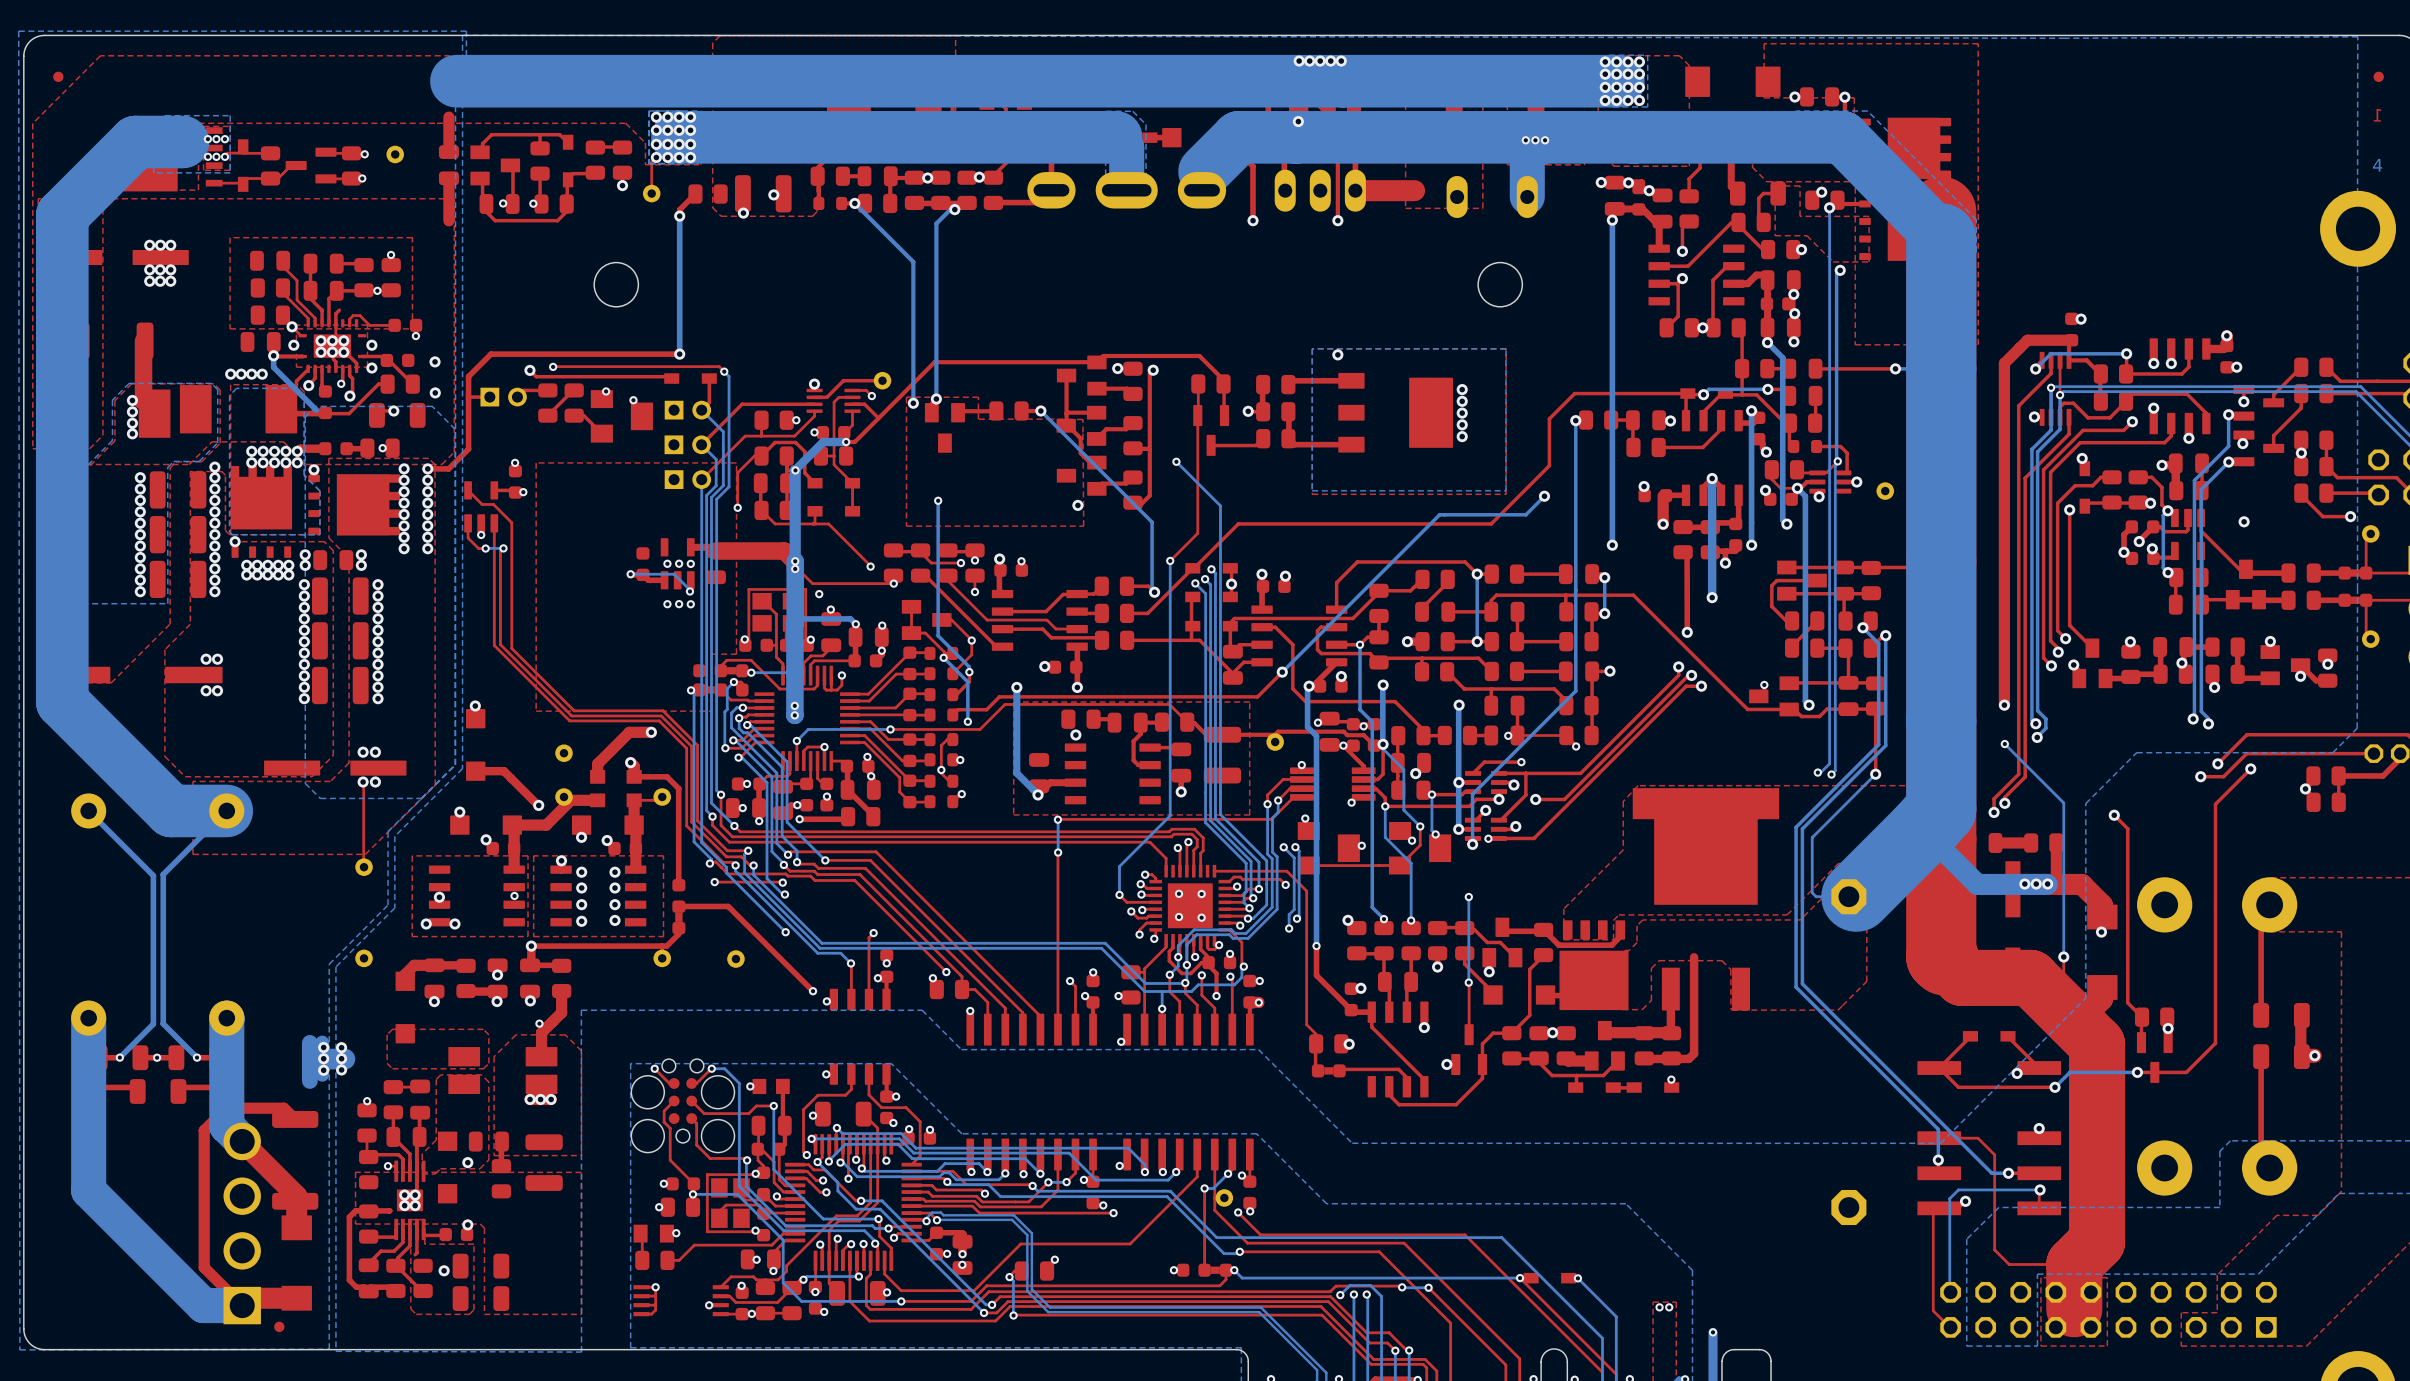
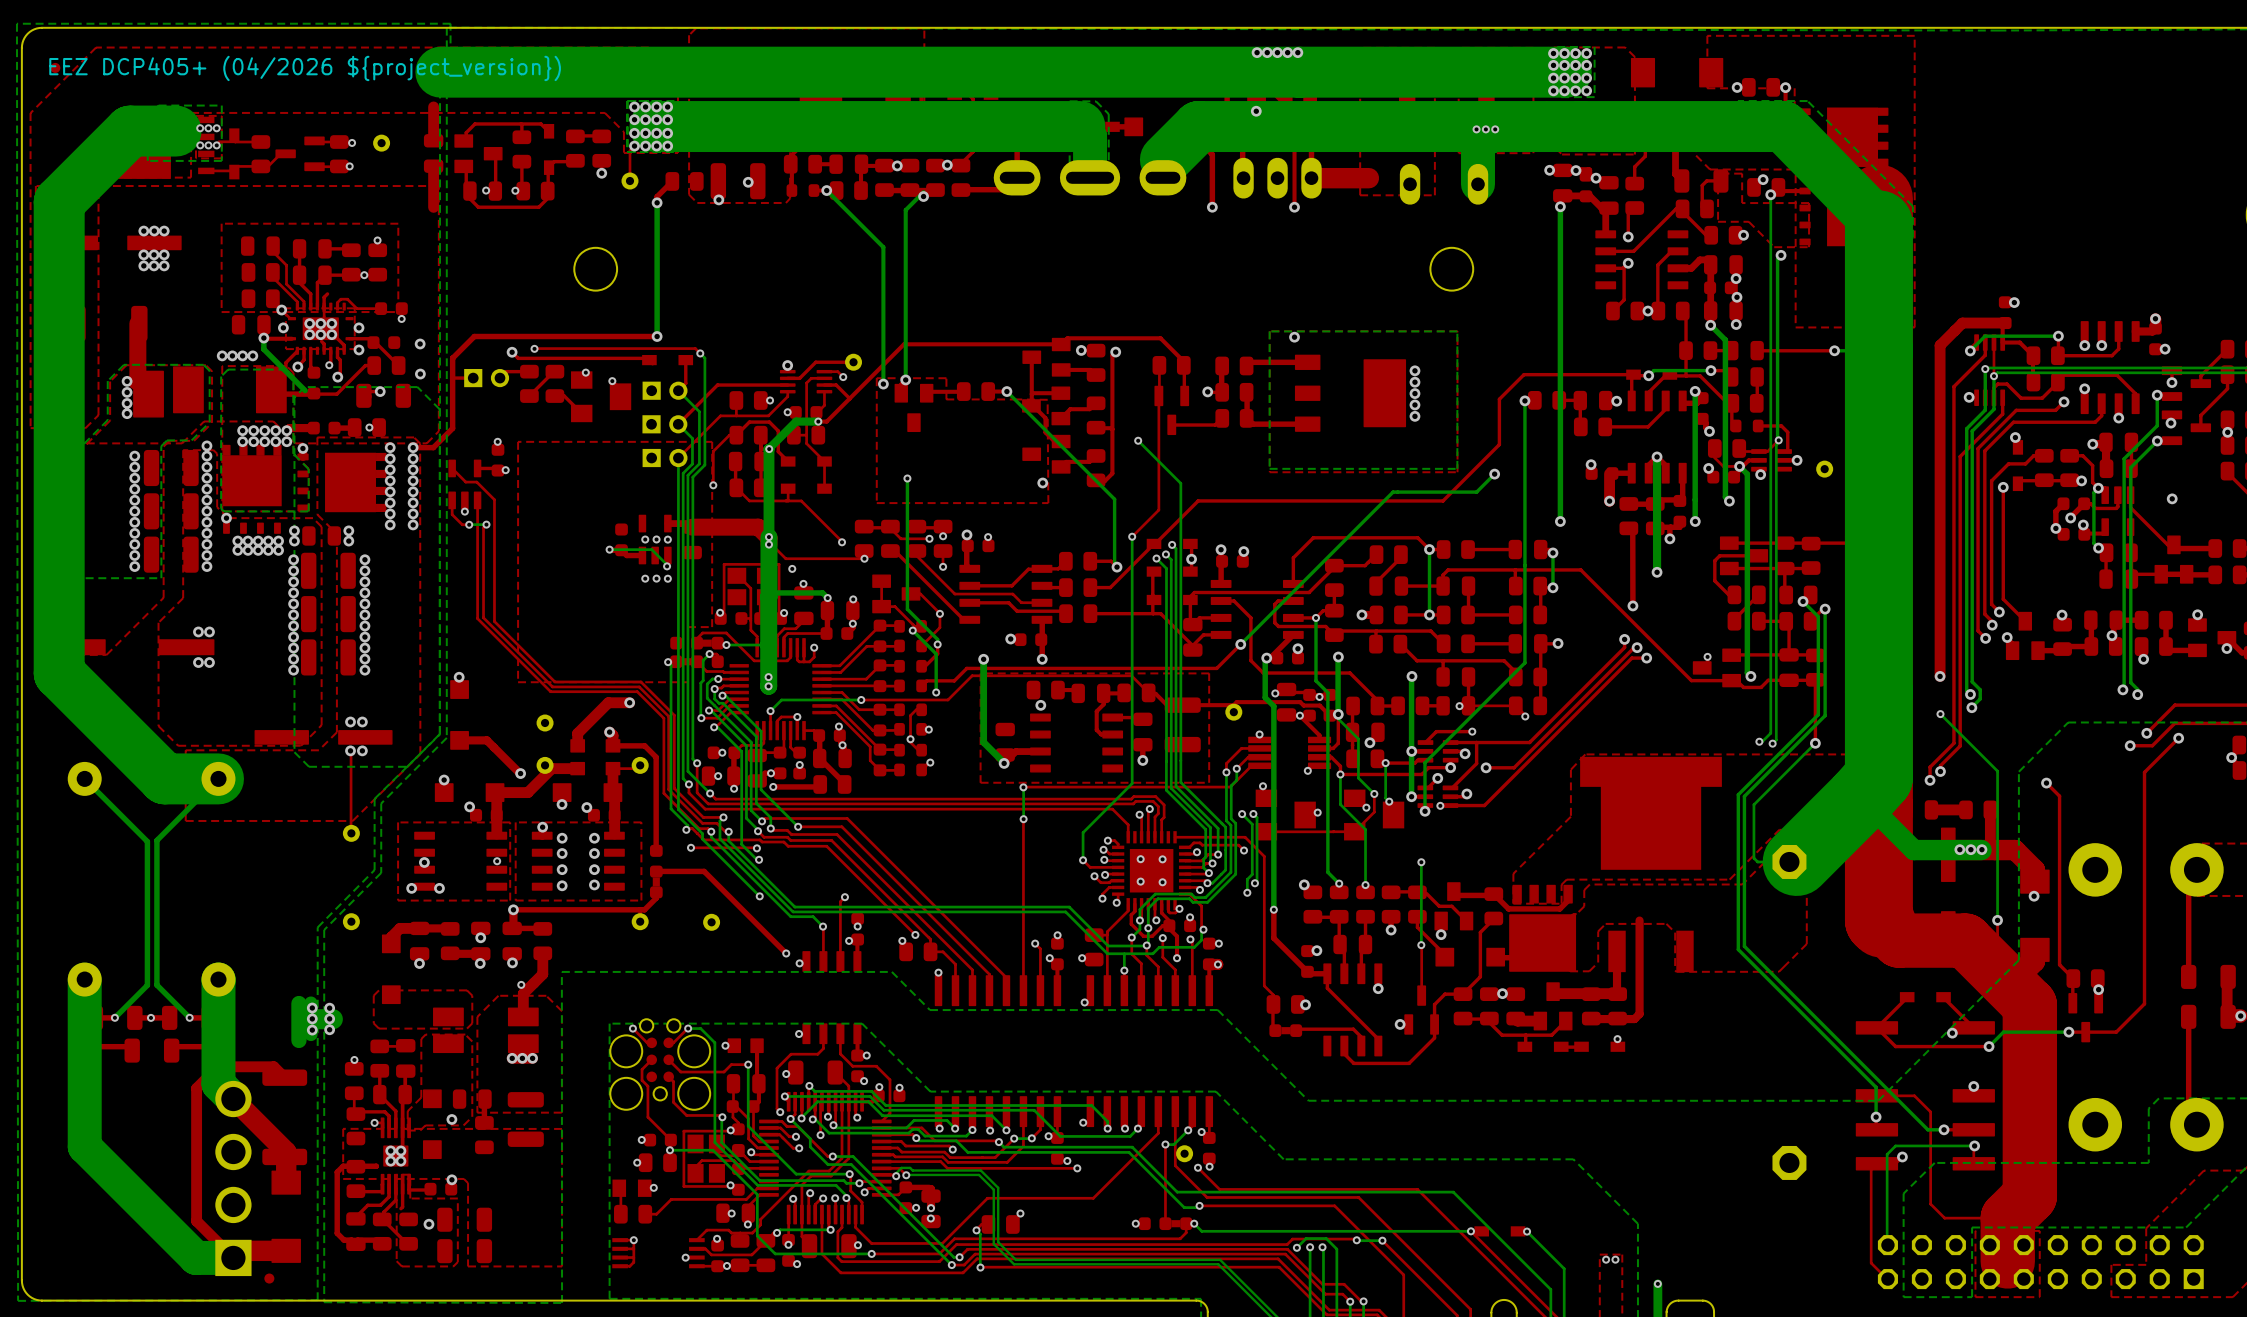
text: none -> EEZ DCP405+ (04/2026 ${project_version}) (305, 68)

